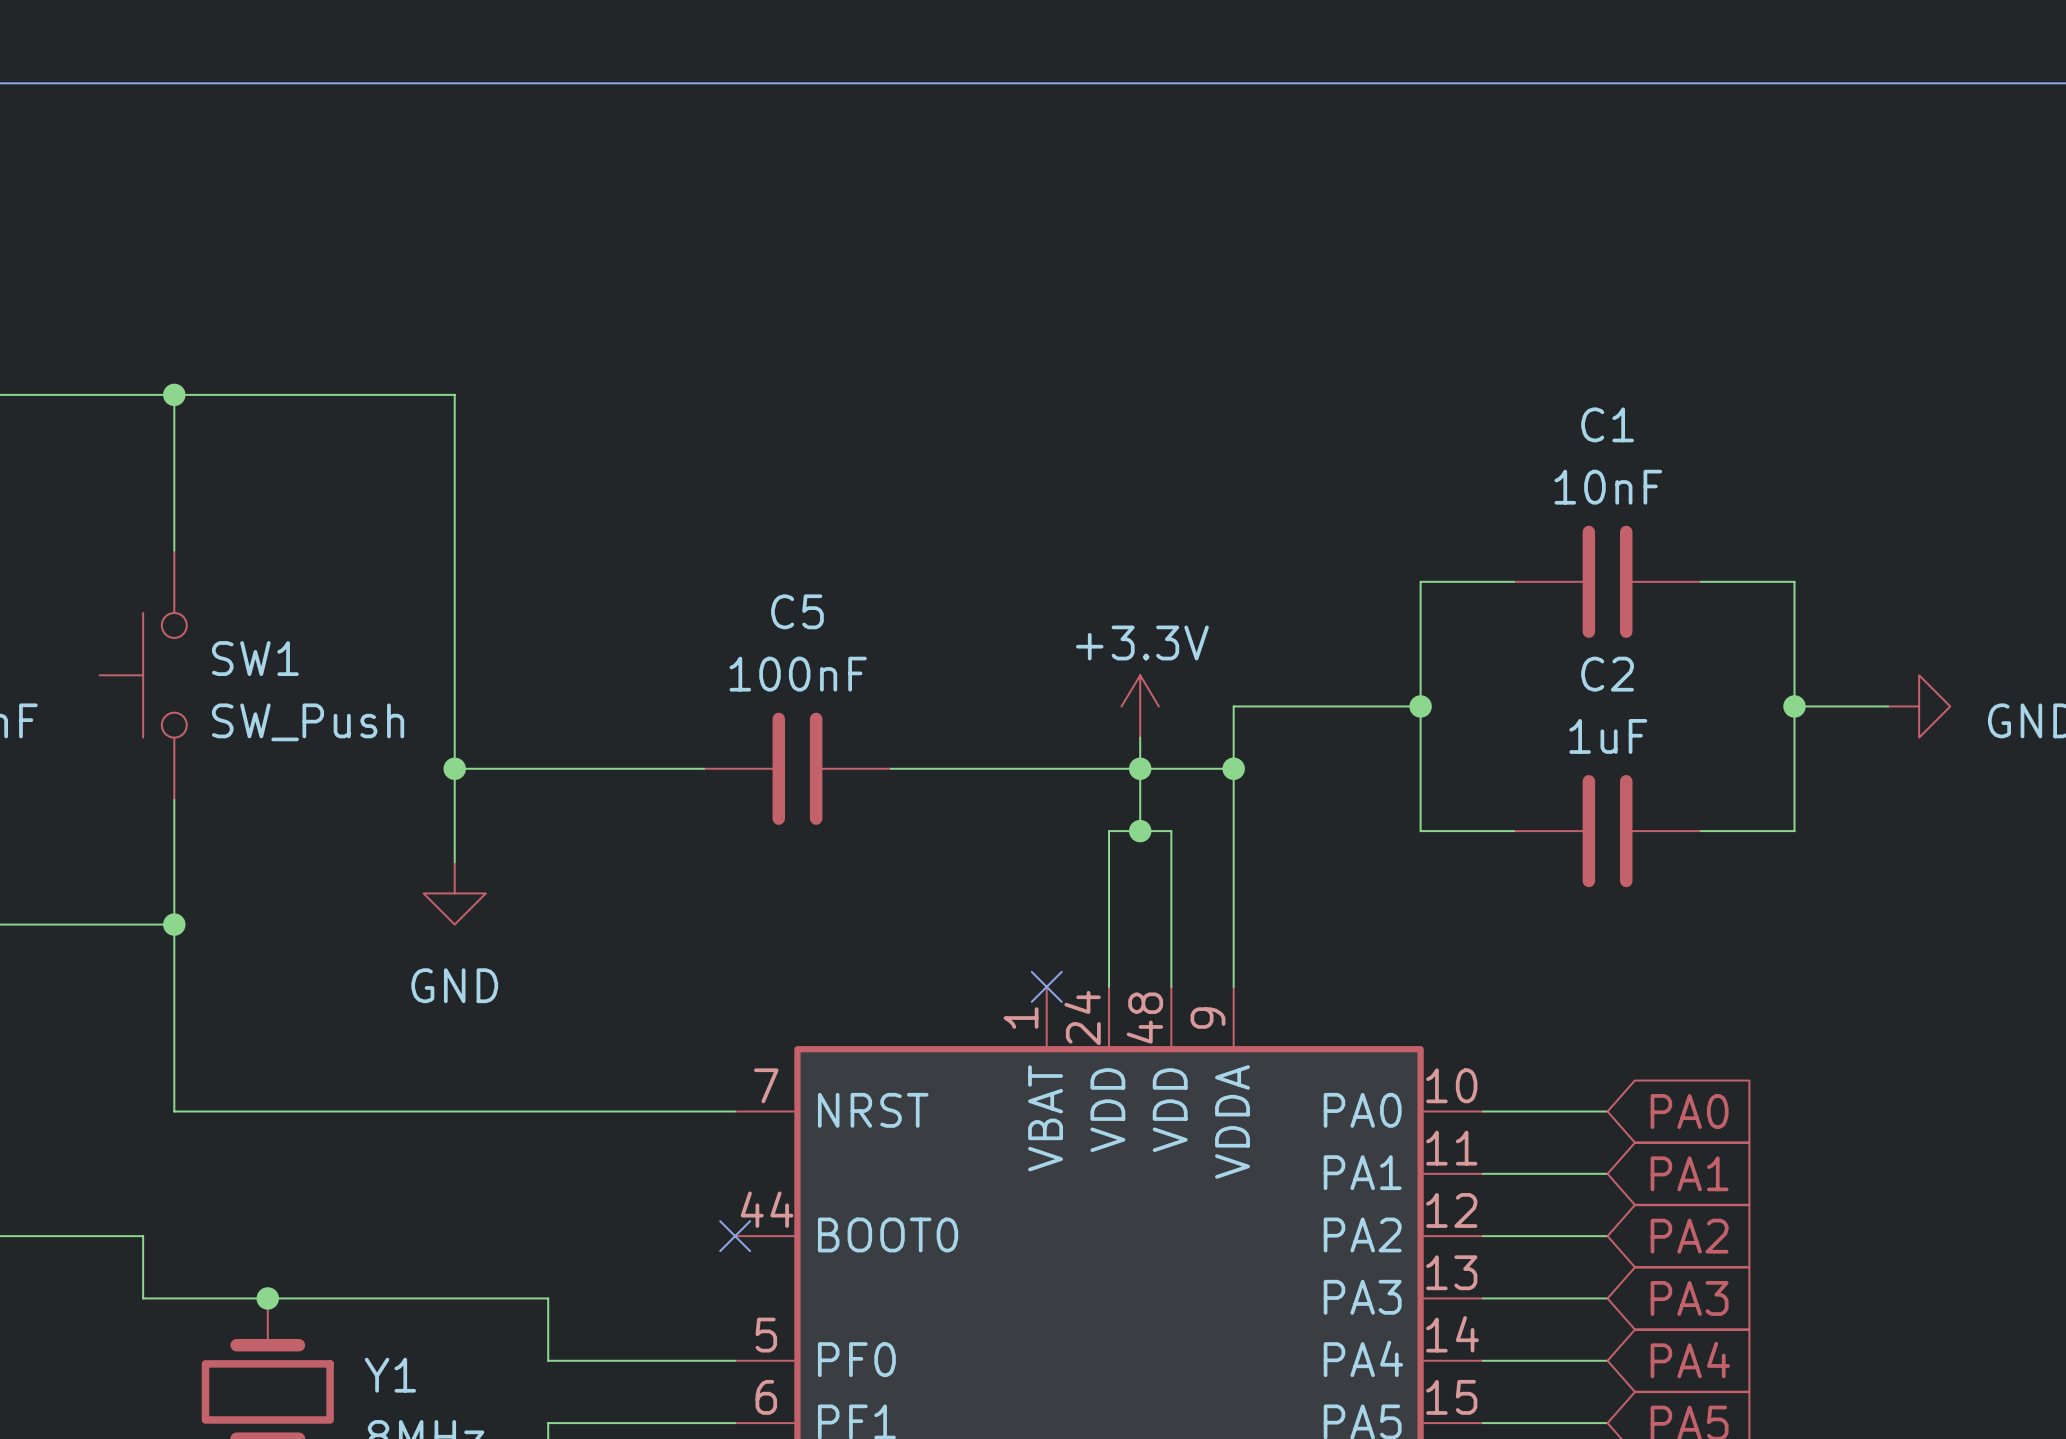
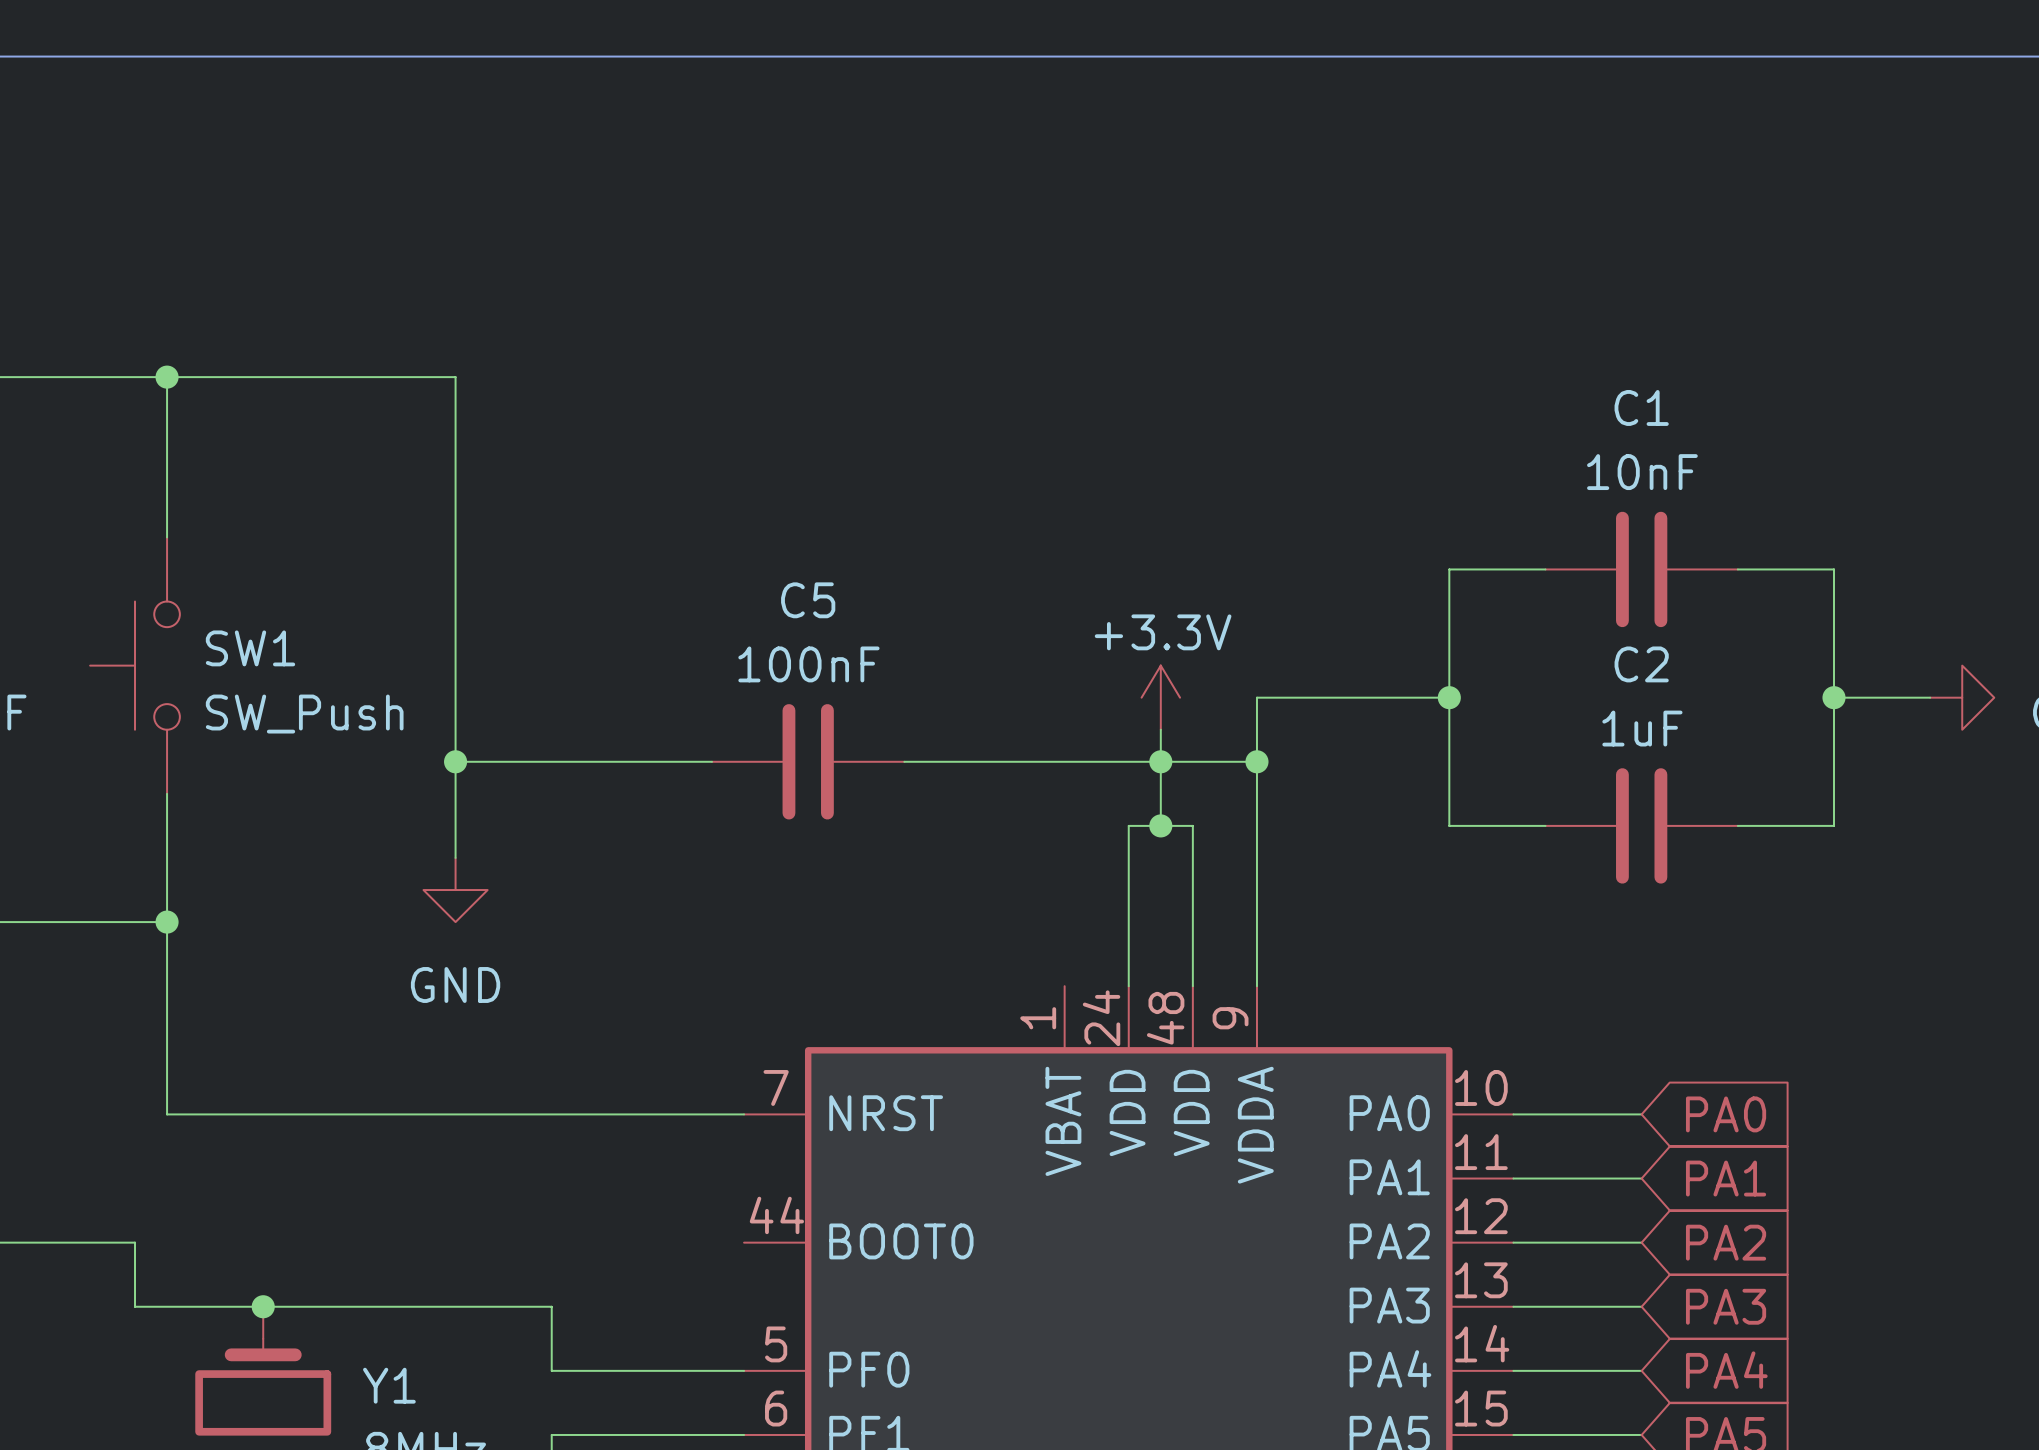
no-connect mark: (1046, 986) -> none
no-connect mark: (735, 1236) -> none

